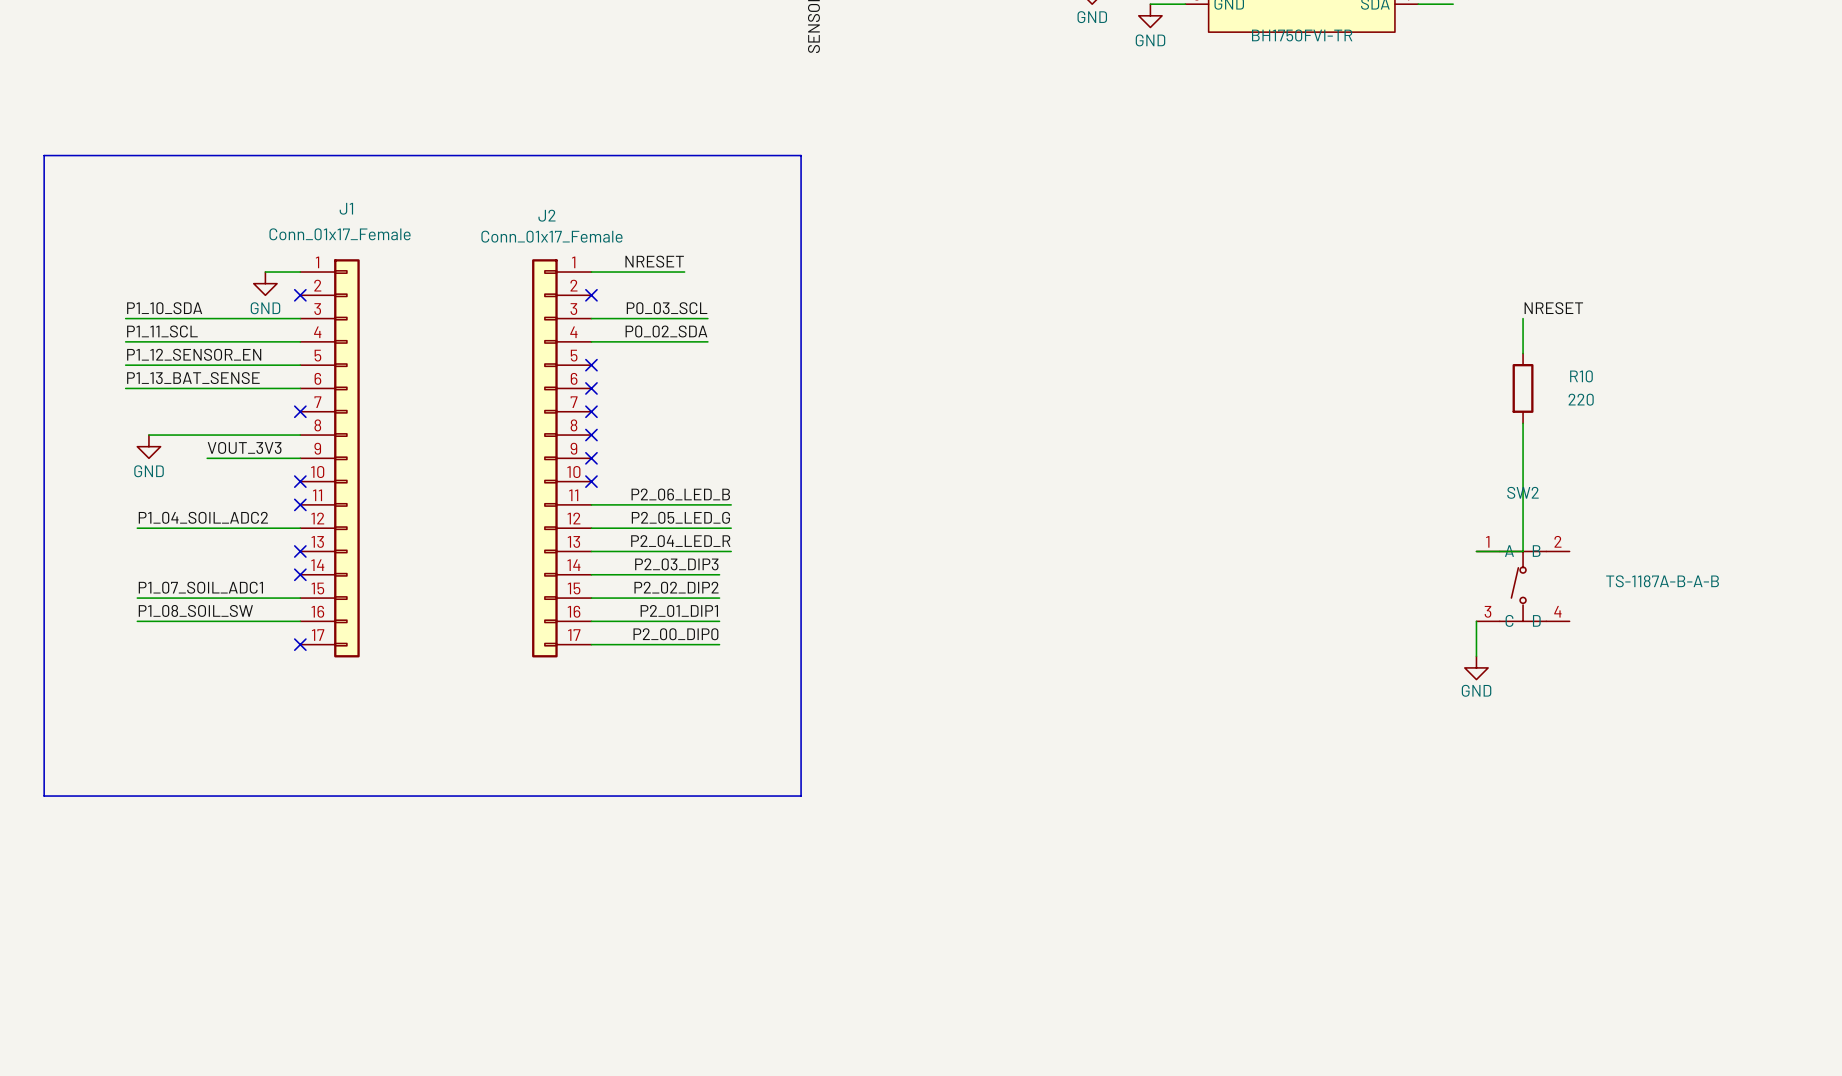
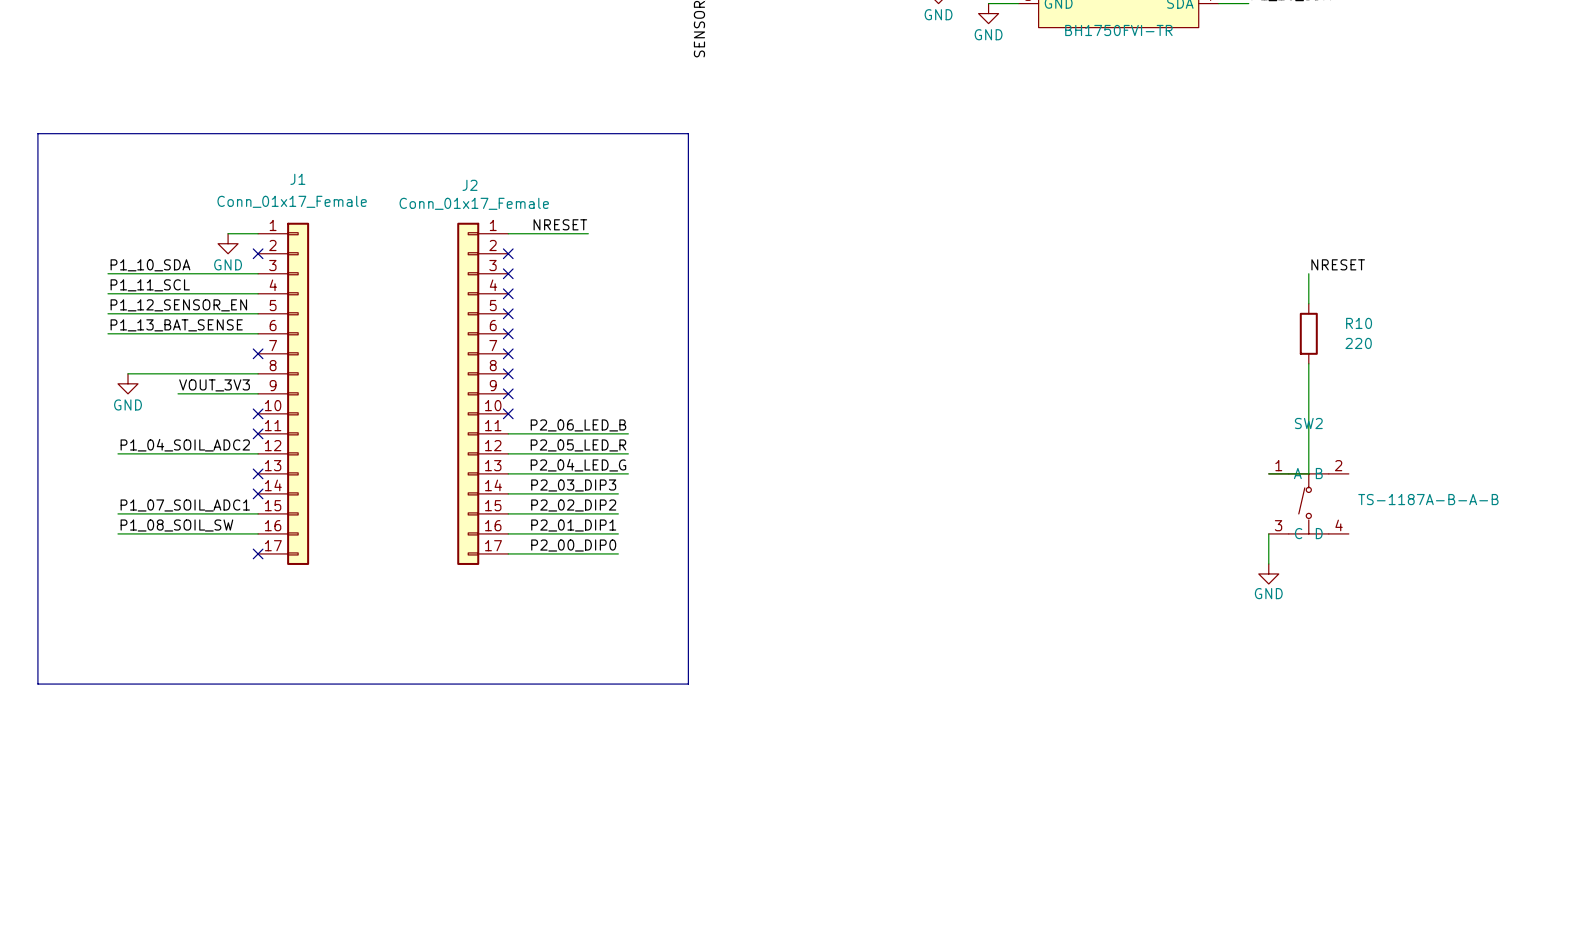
label: P0_03_SCL (667, 308) -> none
wire: (591, 318) (707, 318) -> none
no-connect mark: none -> (508, 273)
label: P0_02_SDA (666, 331) -> none
wire: (591, 341) (707, 341) -> none
no-connect mark: none -> (508, 293)
label: P2_05_LED_G (680, 517) -> P2_05_LED_R (578, 445)
label: P2_04_LED_R (680, 541) -> P2_04_LED_G (578, 465)

